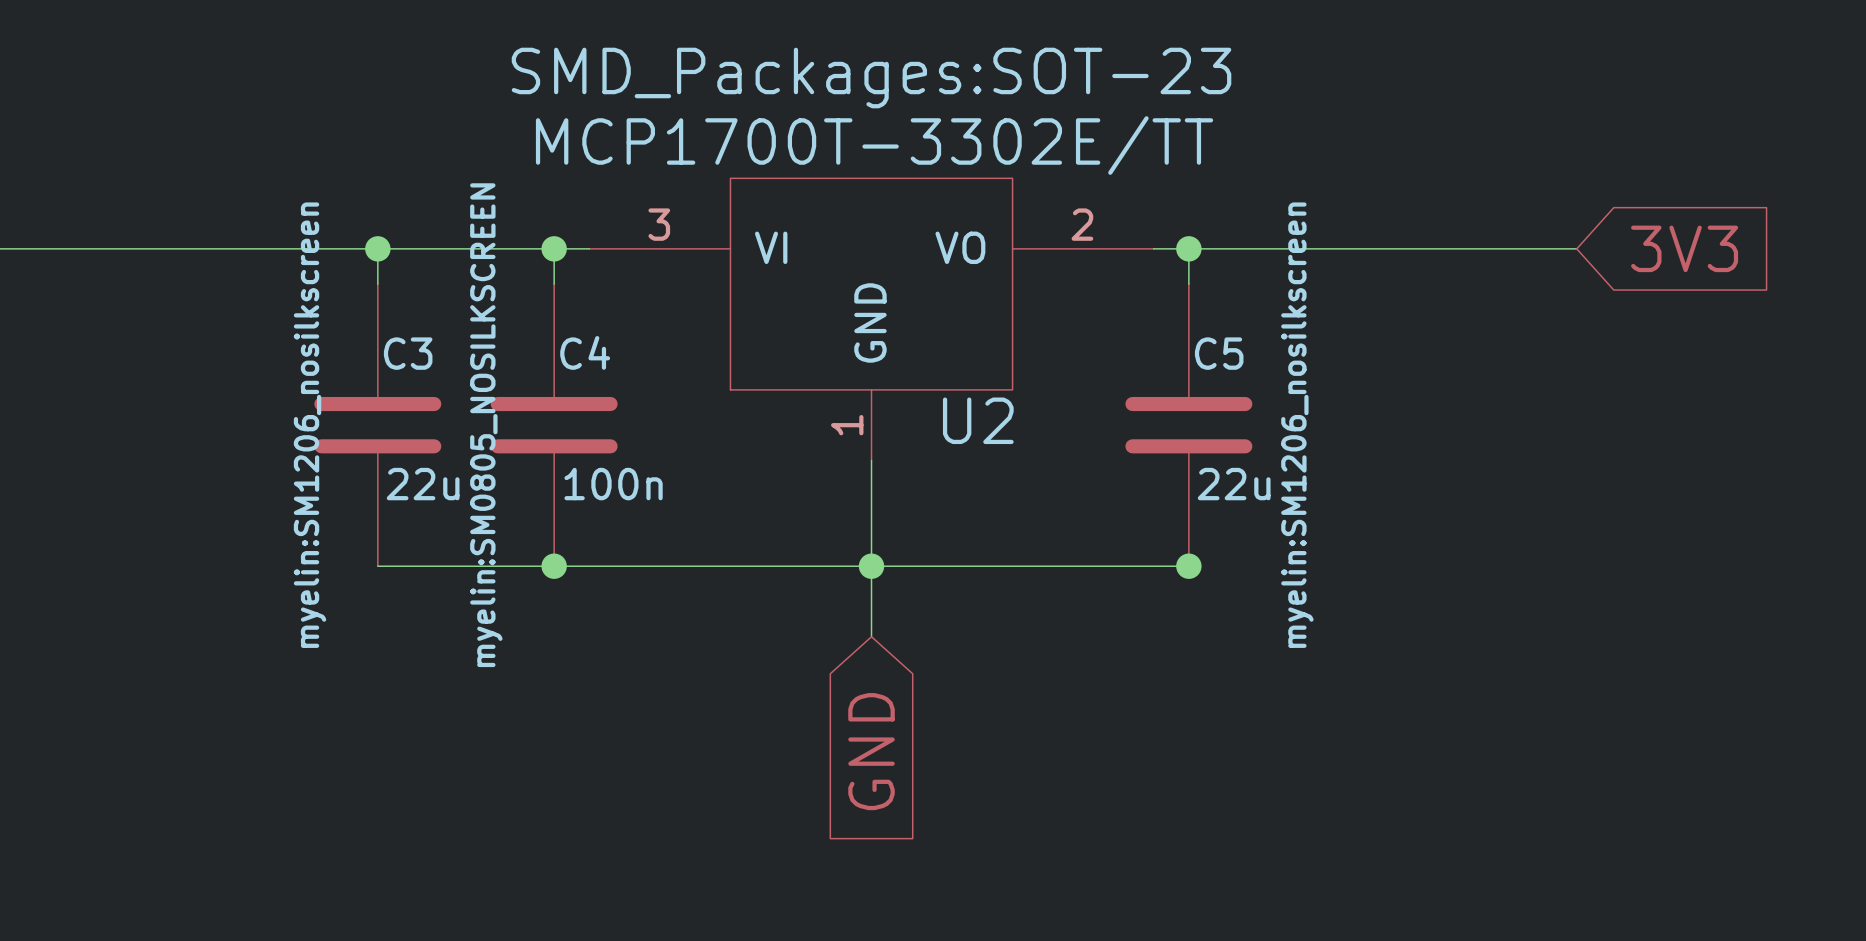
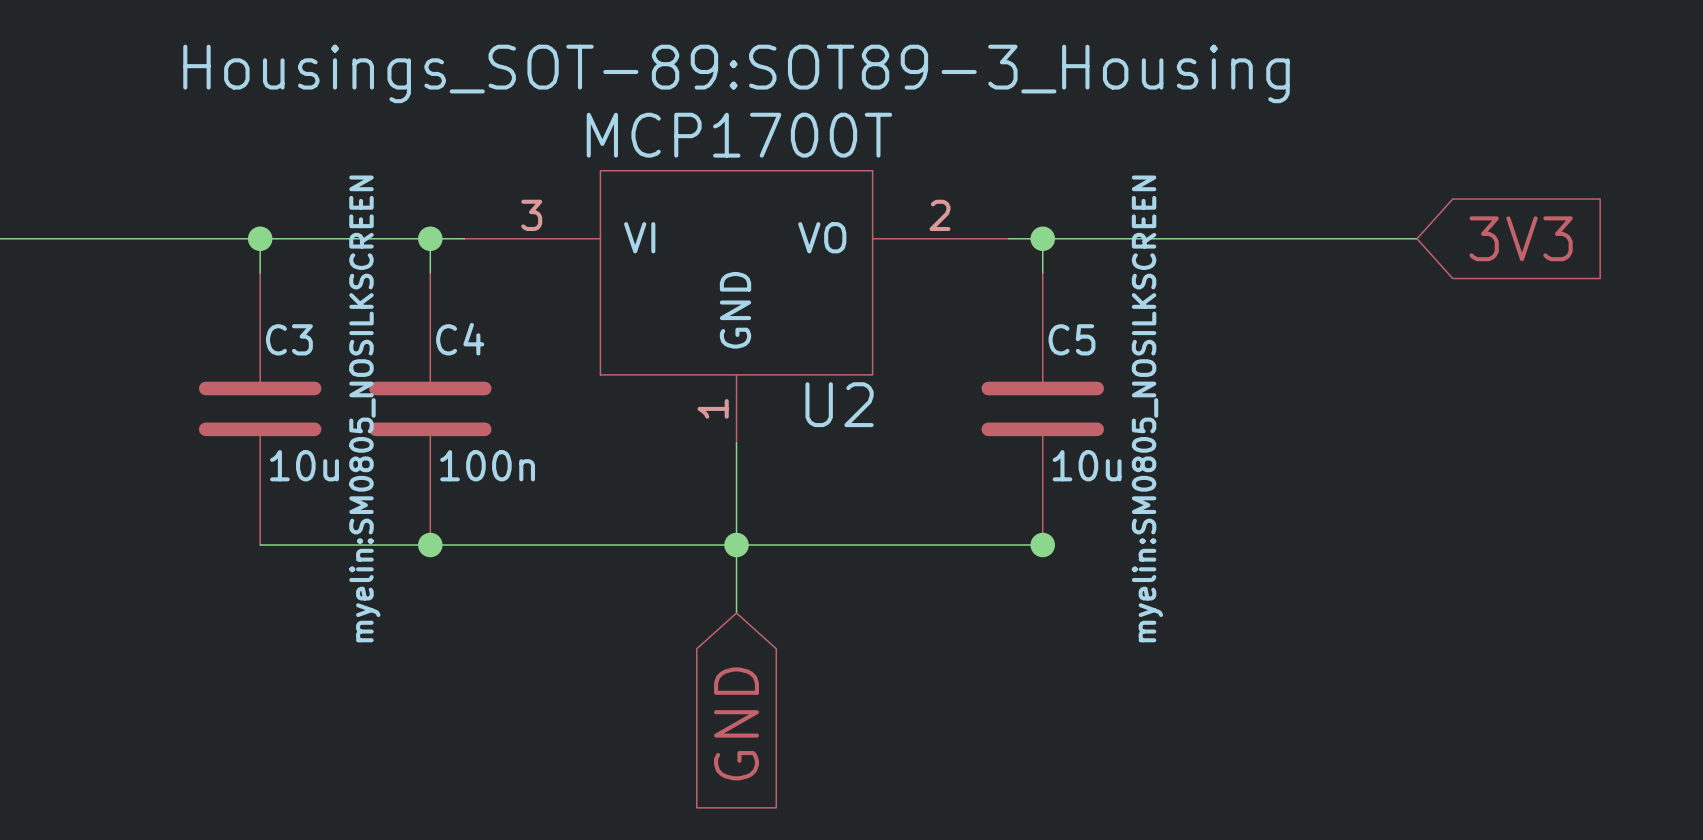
U2 text: SMD_Packages:SOT-23 (871, 78) -> Housings_SOT-89:SOT89-3_Housing (736, 73)
U2 value: MCP1700T-3302E/TT (874, 145) -> MCP1700T (739, 135)
C3 text: myelin:SM1206_nosilkscreen (310, 425) -> none
C5 text: myelin:SM1206_nosilkscreen (1297, 425) -> myelin:SM0805_NOSILKSCREEN (1147, 408)
C3 value: 22u (423, 484) -> 10u (304, 465)
C5 value: 22u (1234, 484) -> 10u (1087, 465)

